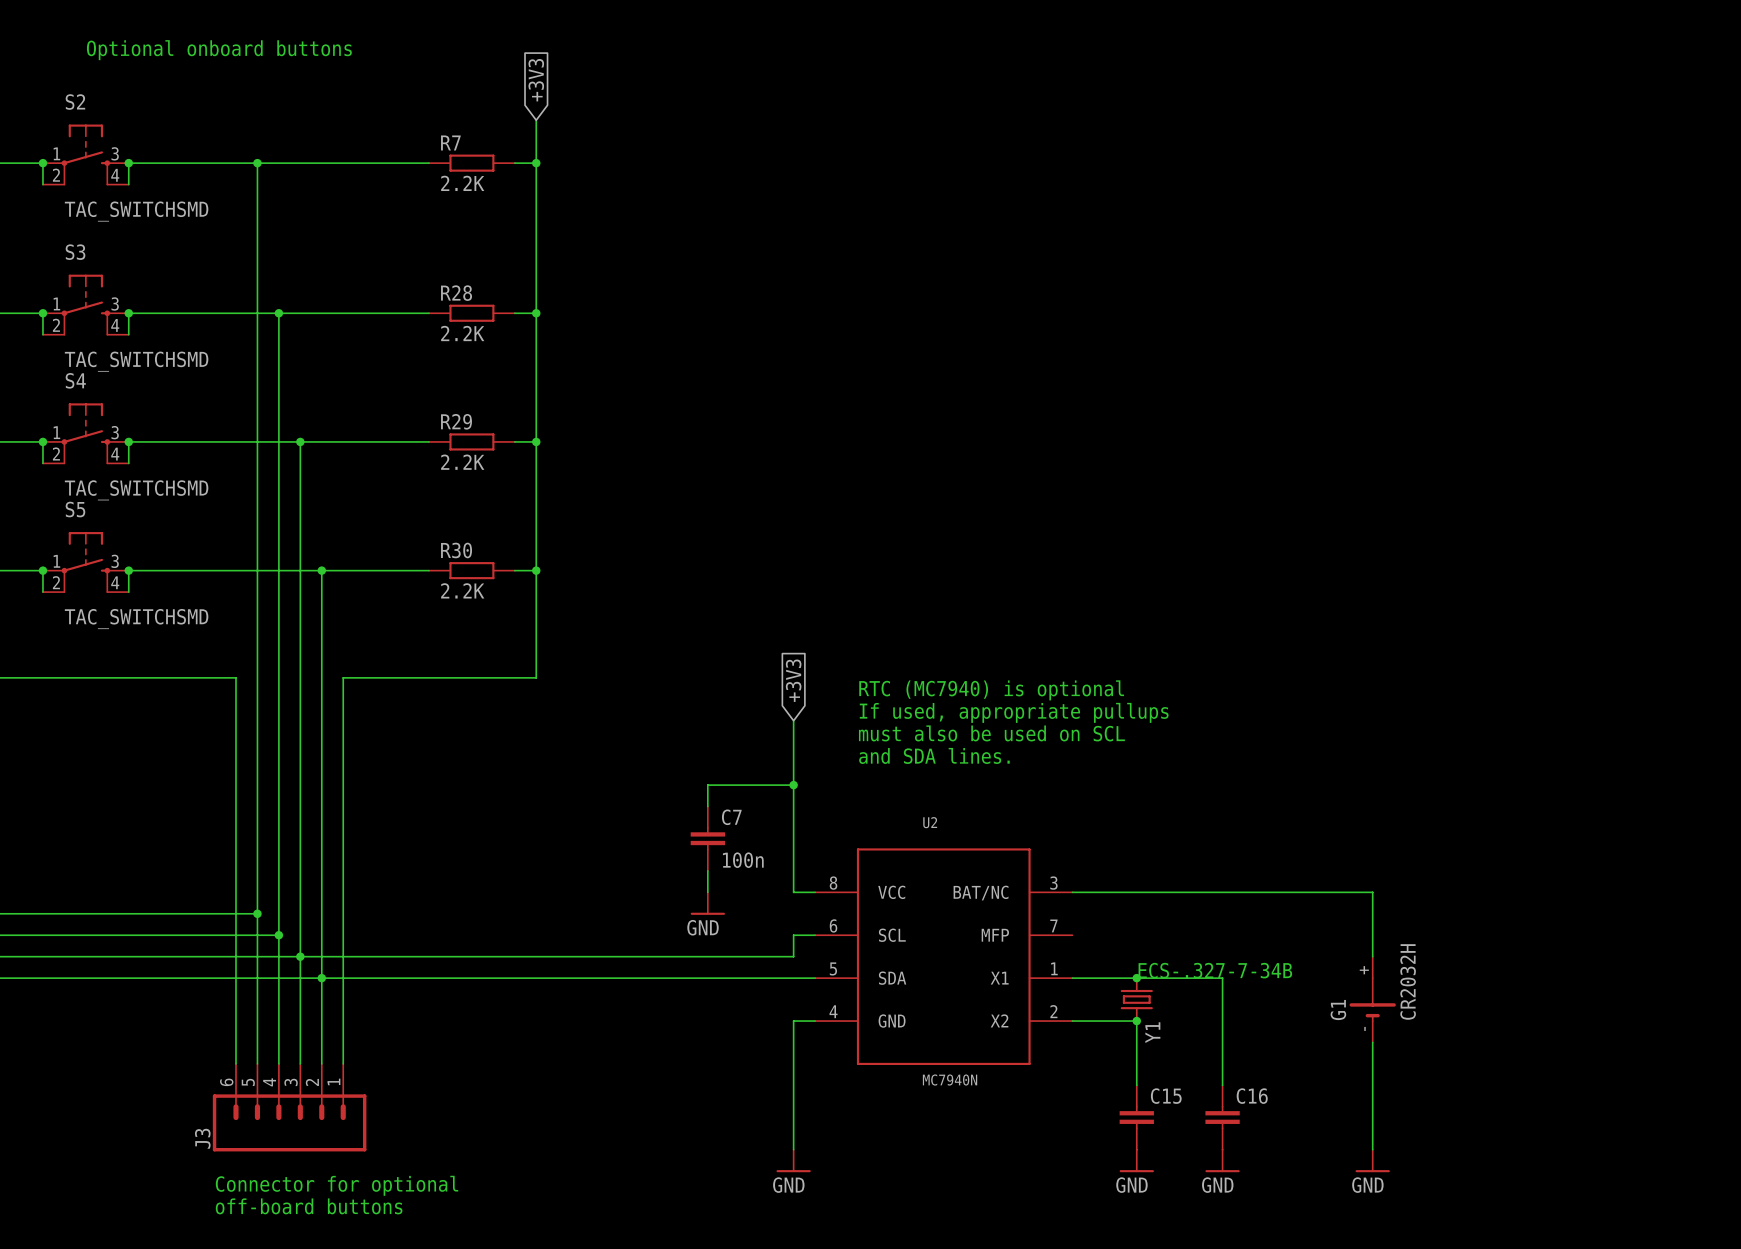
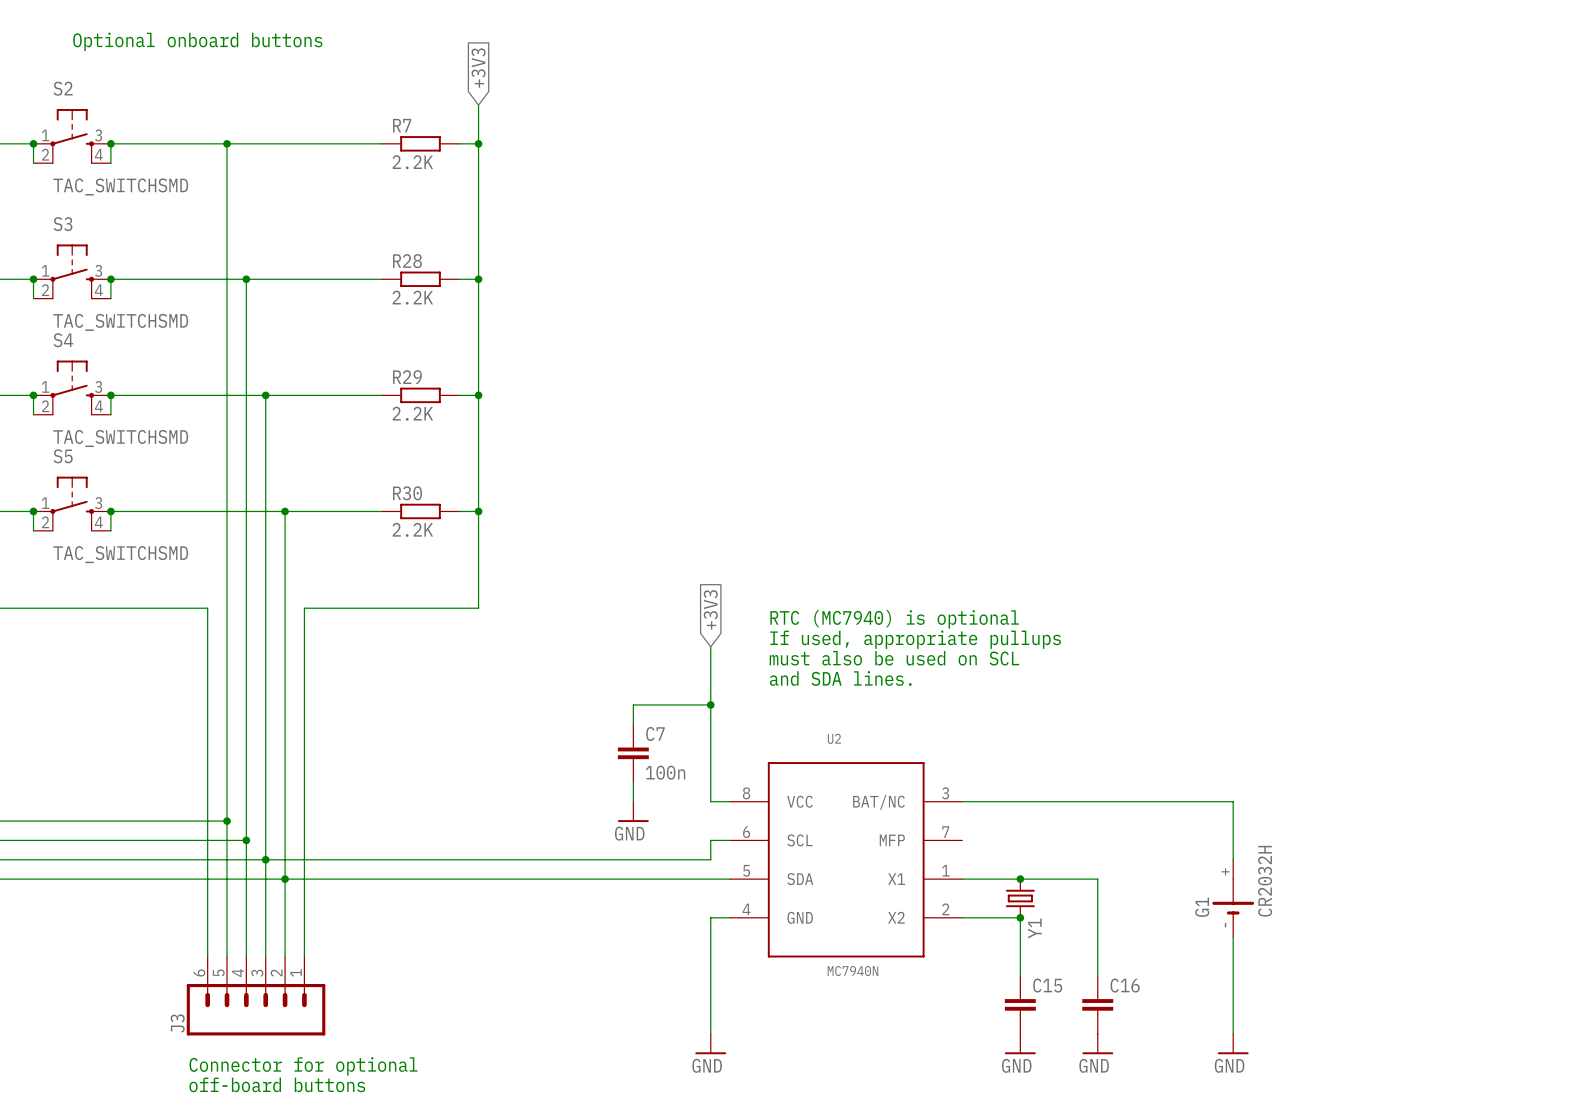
text: ECS-.327-7-34B (1215, 970) -> none

